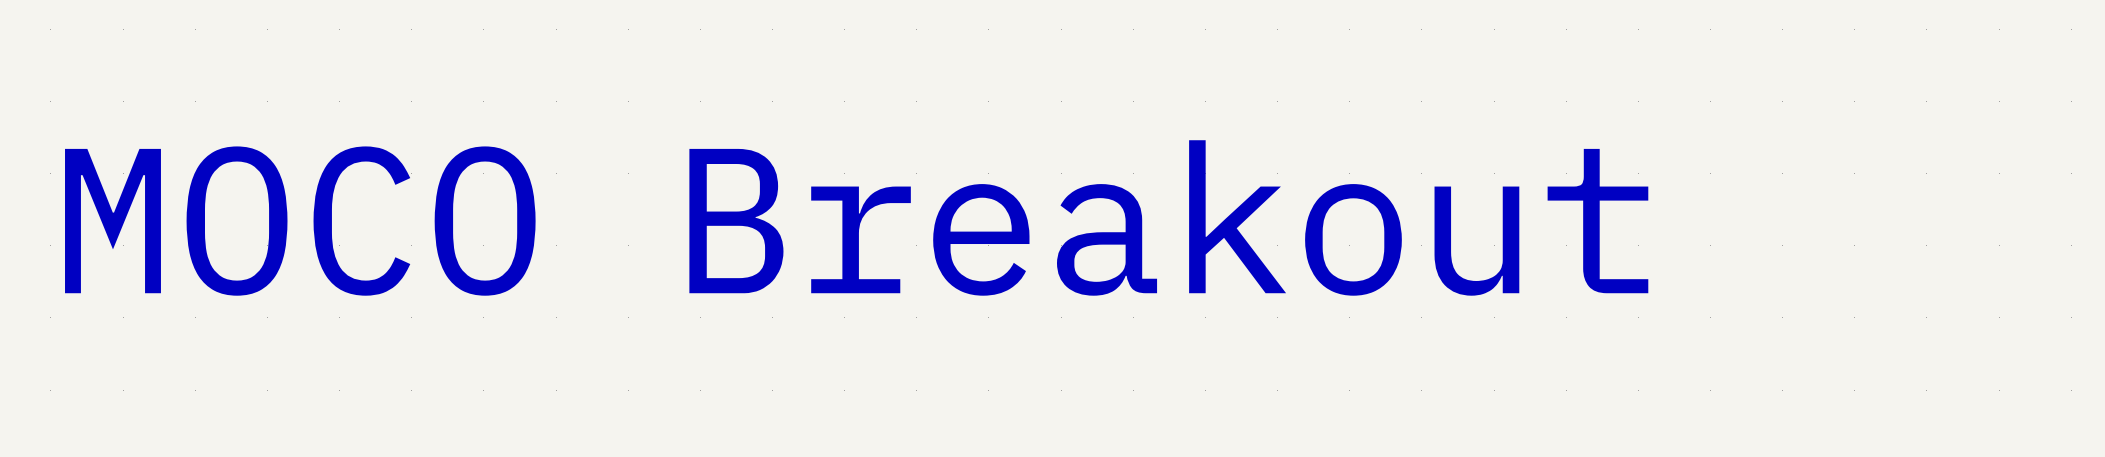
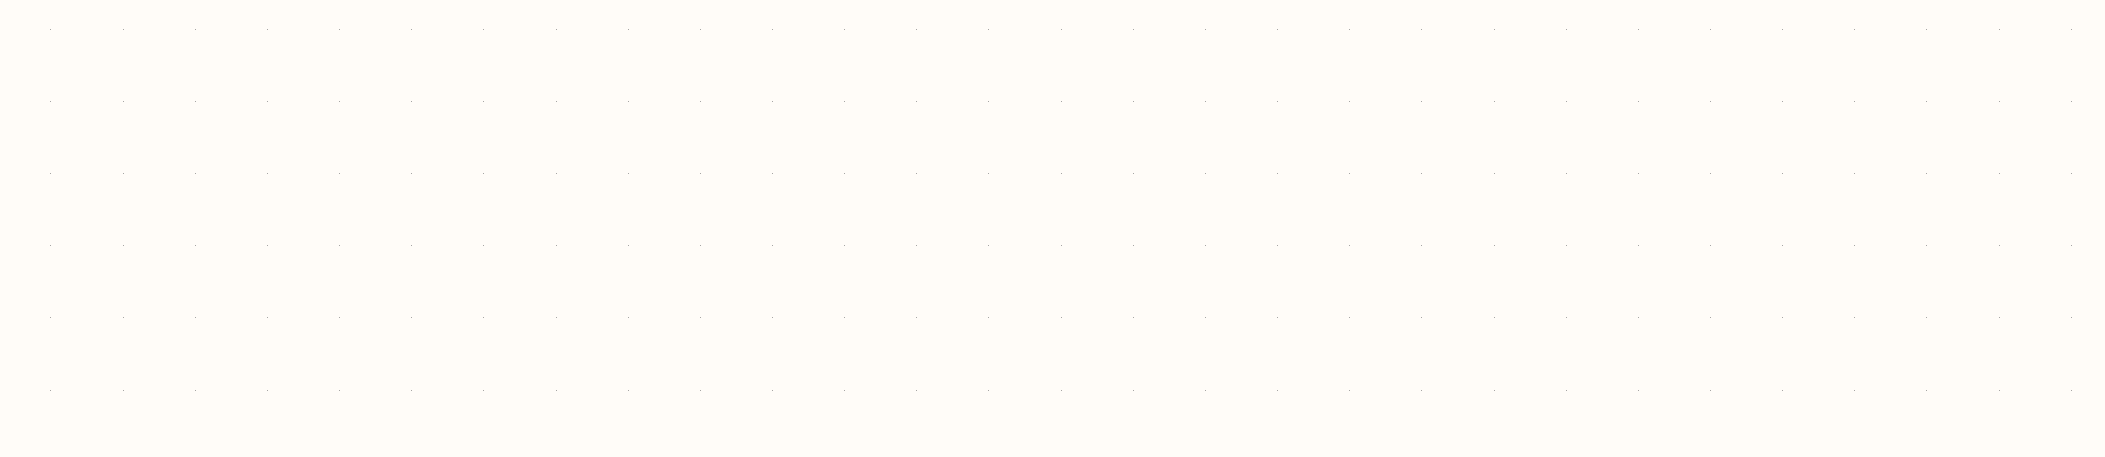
text: MOCO Breakout (856, 217) -> none

